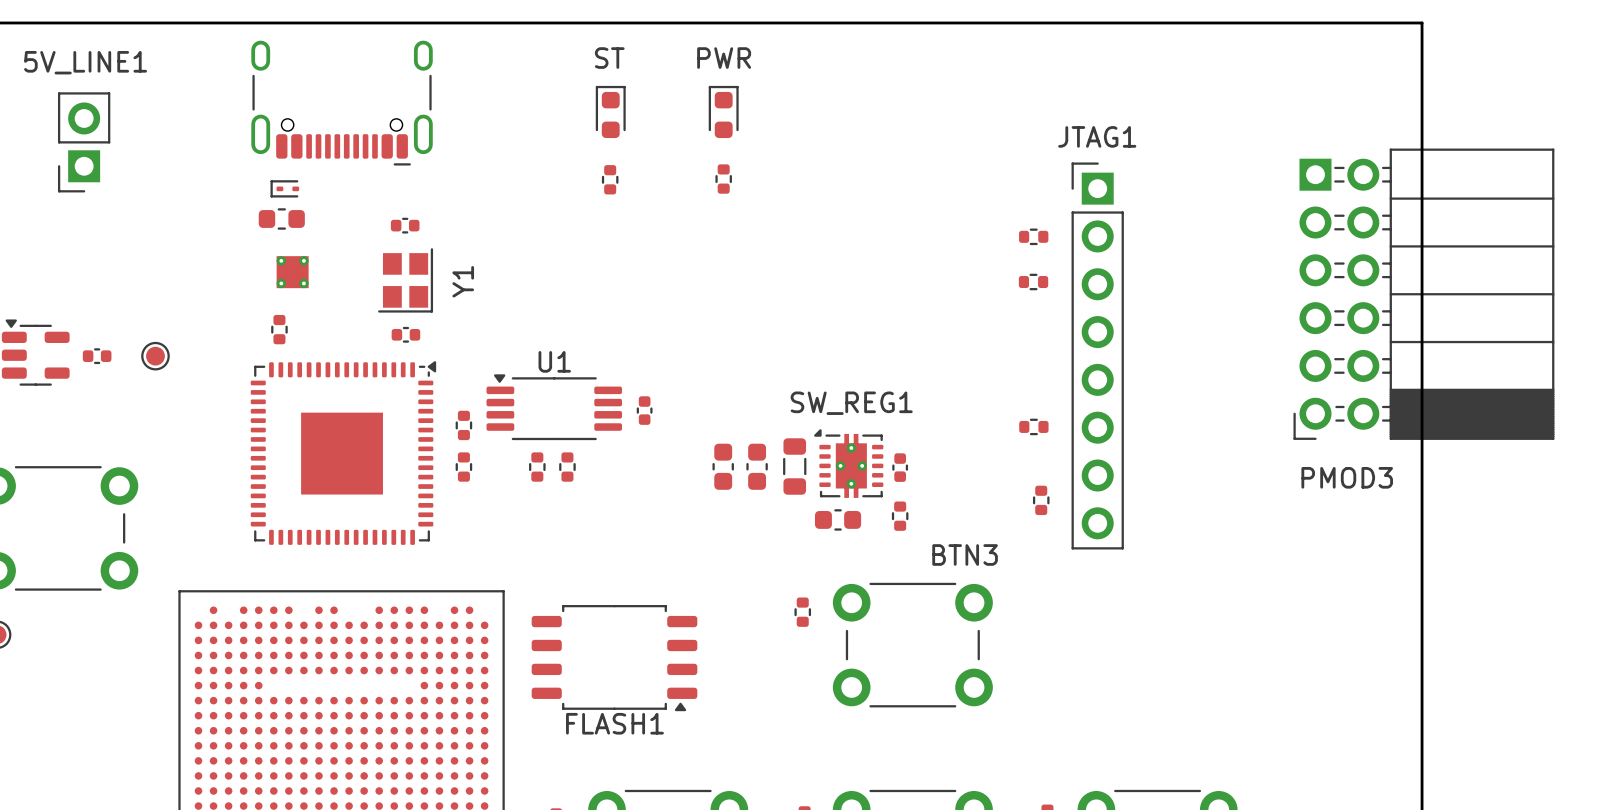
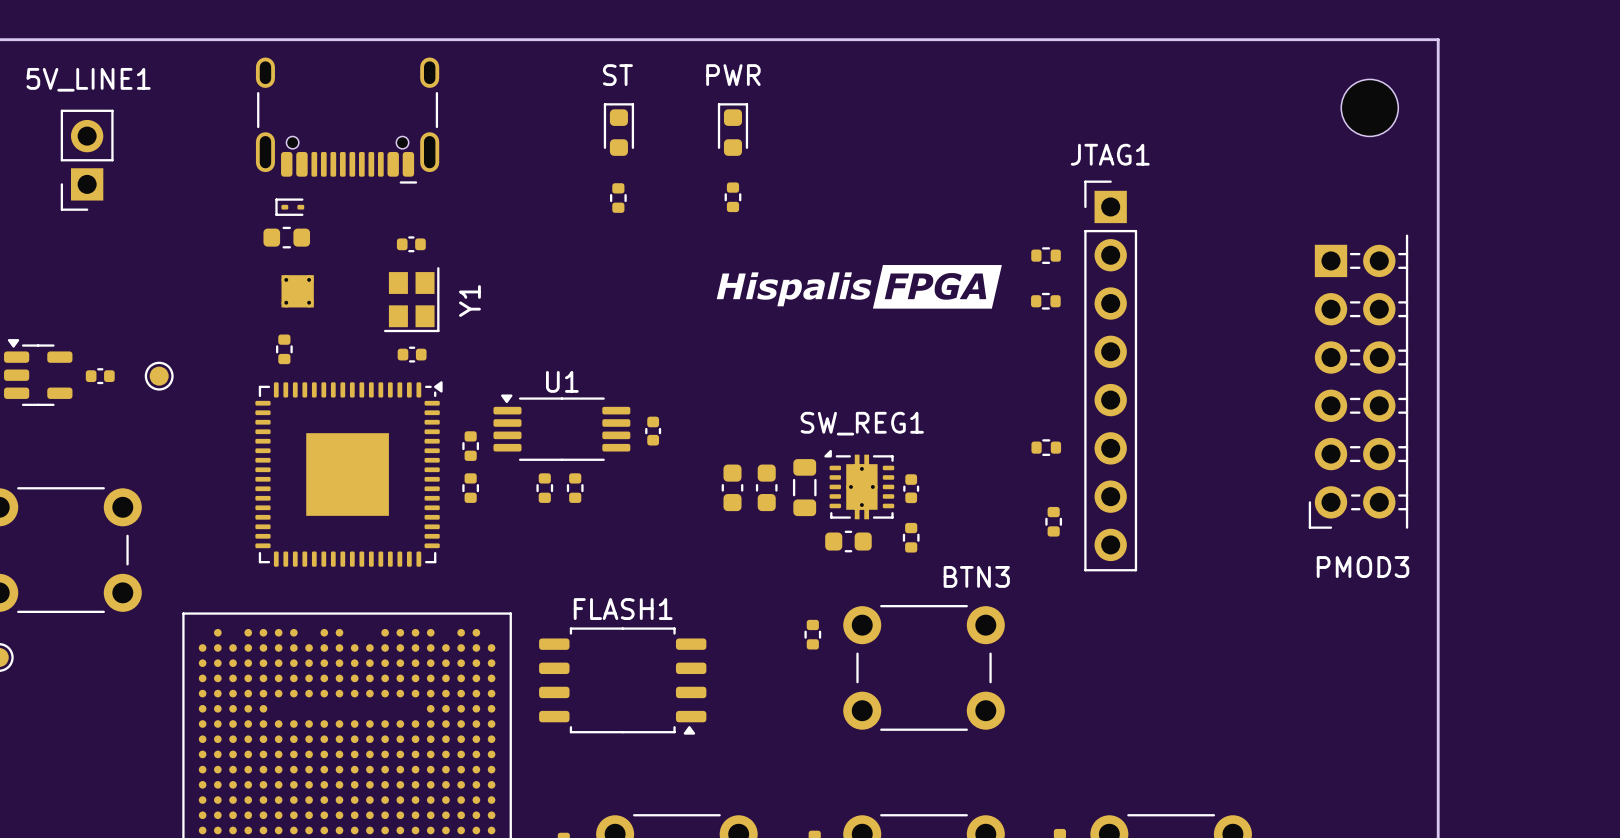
part: none -> (1369, 107)
PMOD3 footprint: [1293, 148, 1555, 440] -> [1308, 234, 1409, 529]
drawing: none -> [716, 265, 1002, 309]
PMOD3 name position: PMOD3 (1347, 477) -> PMOD3 (1363, 567)
FLASH1 name position: FLASH1 (614, 723) -> FLASH1 (623, 609)

